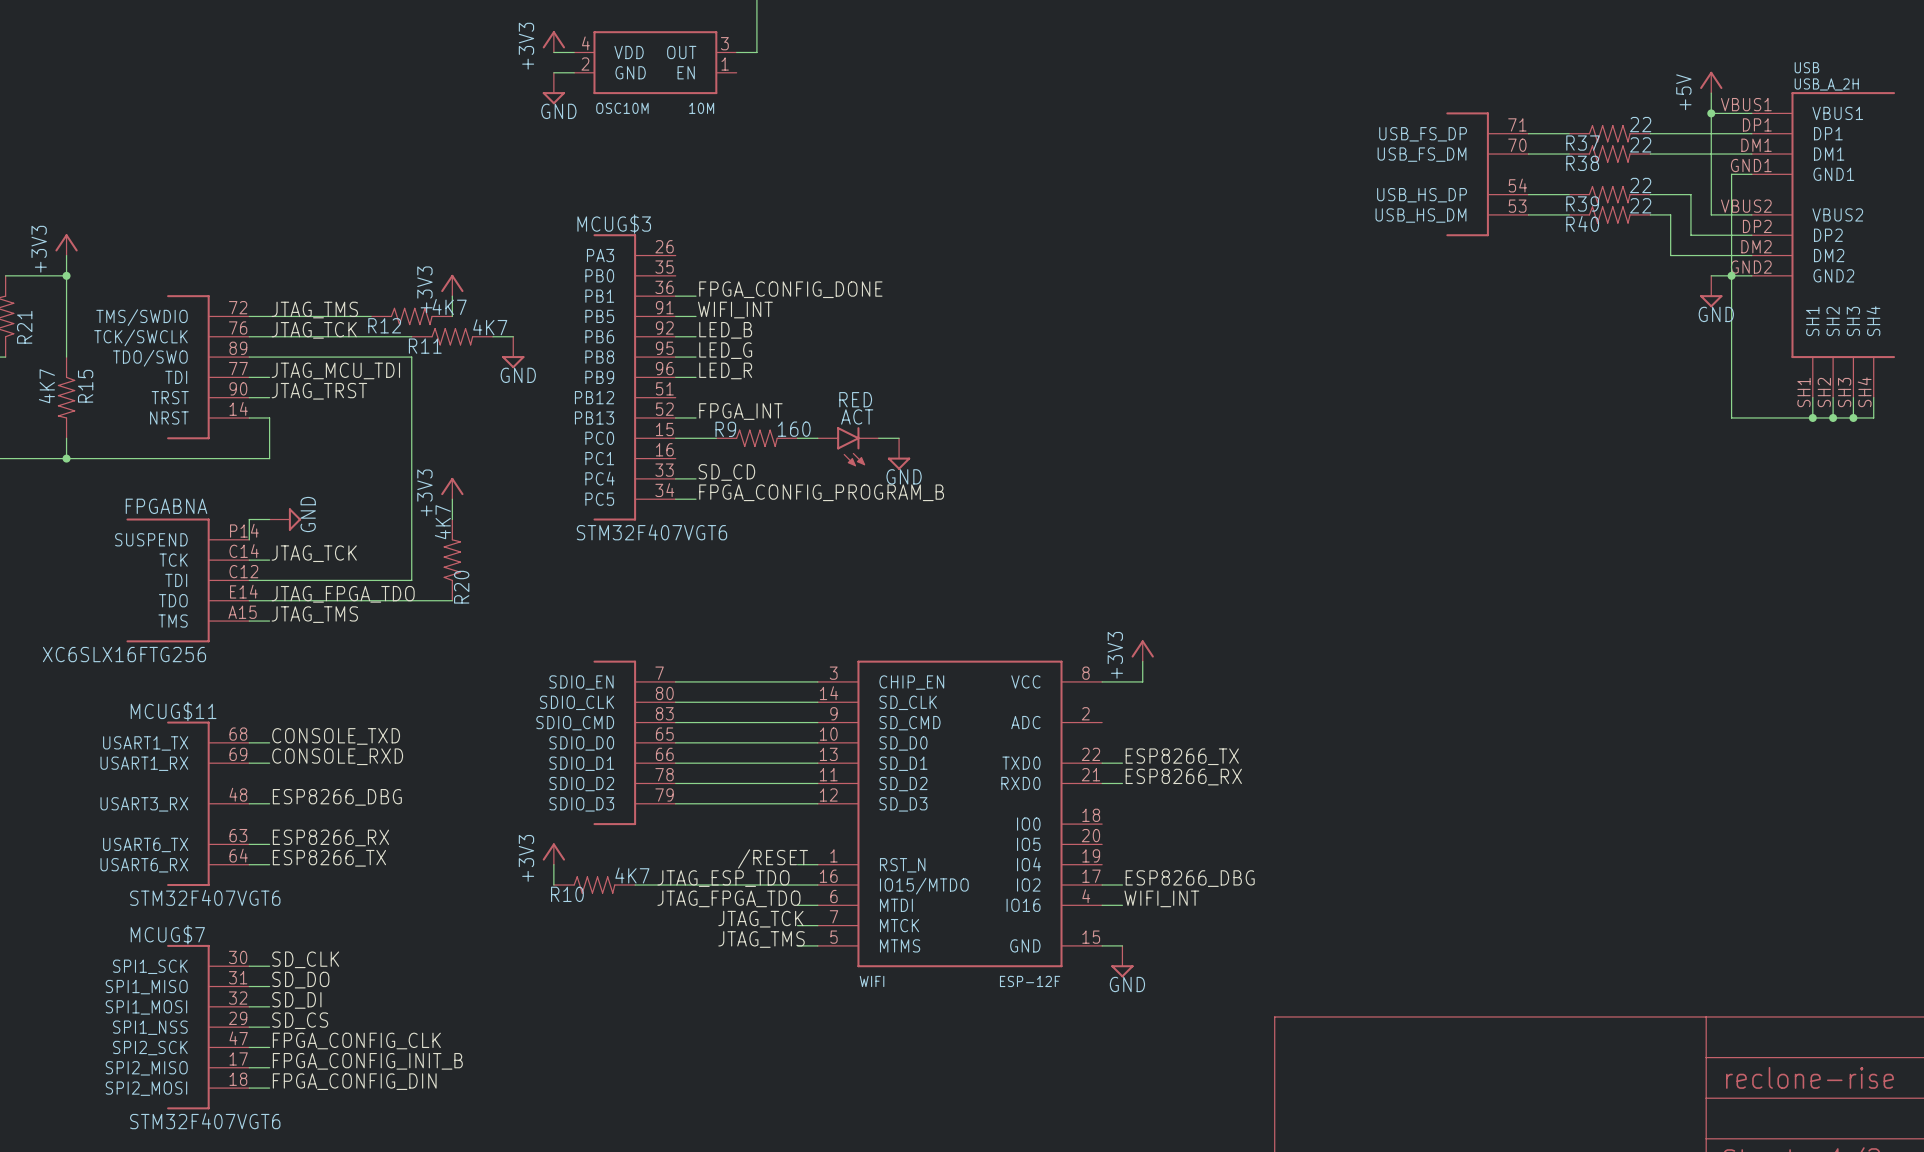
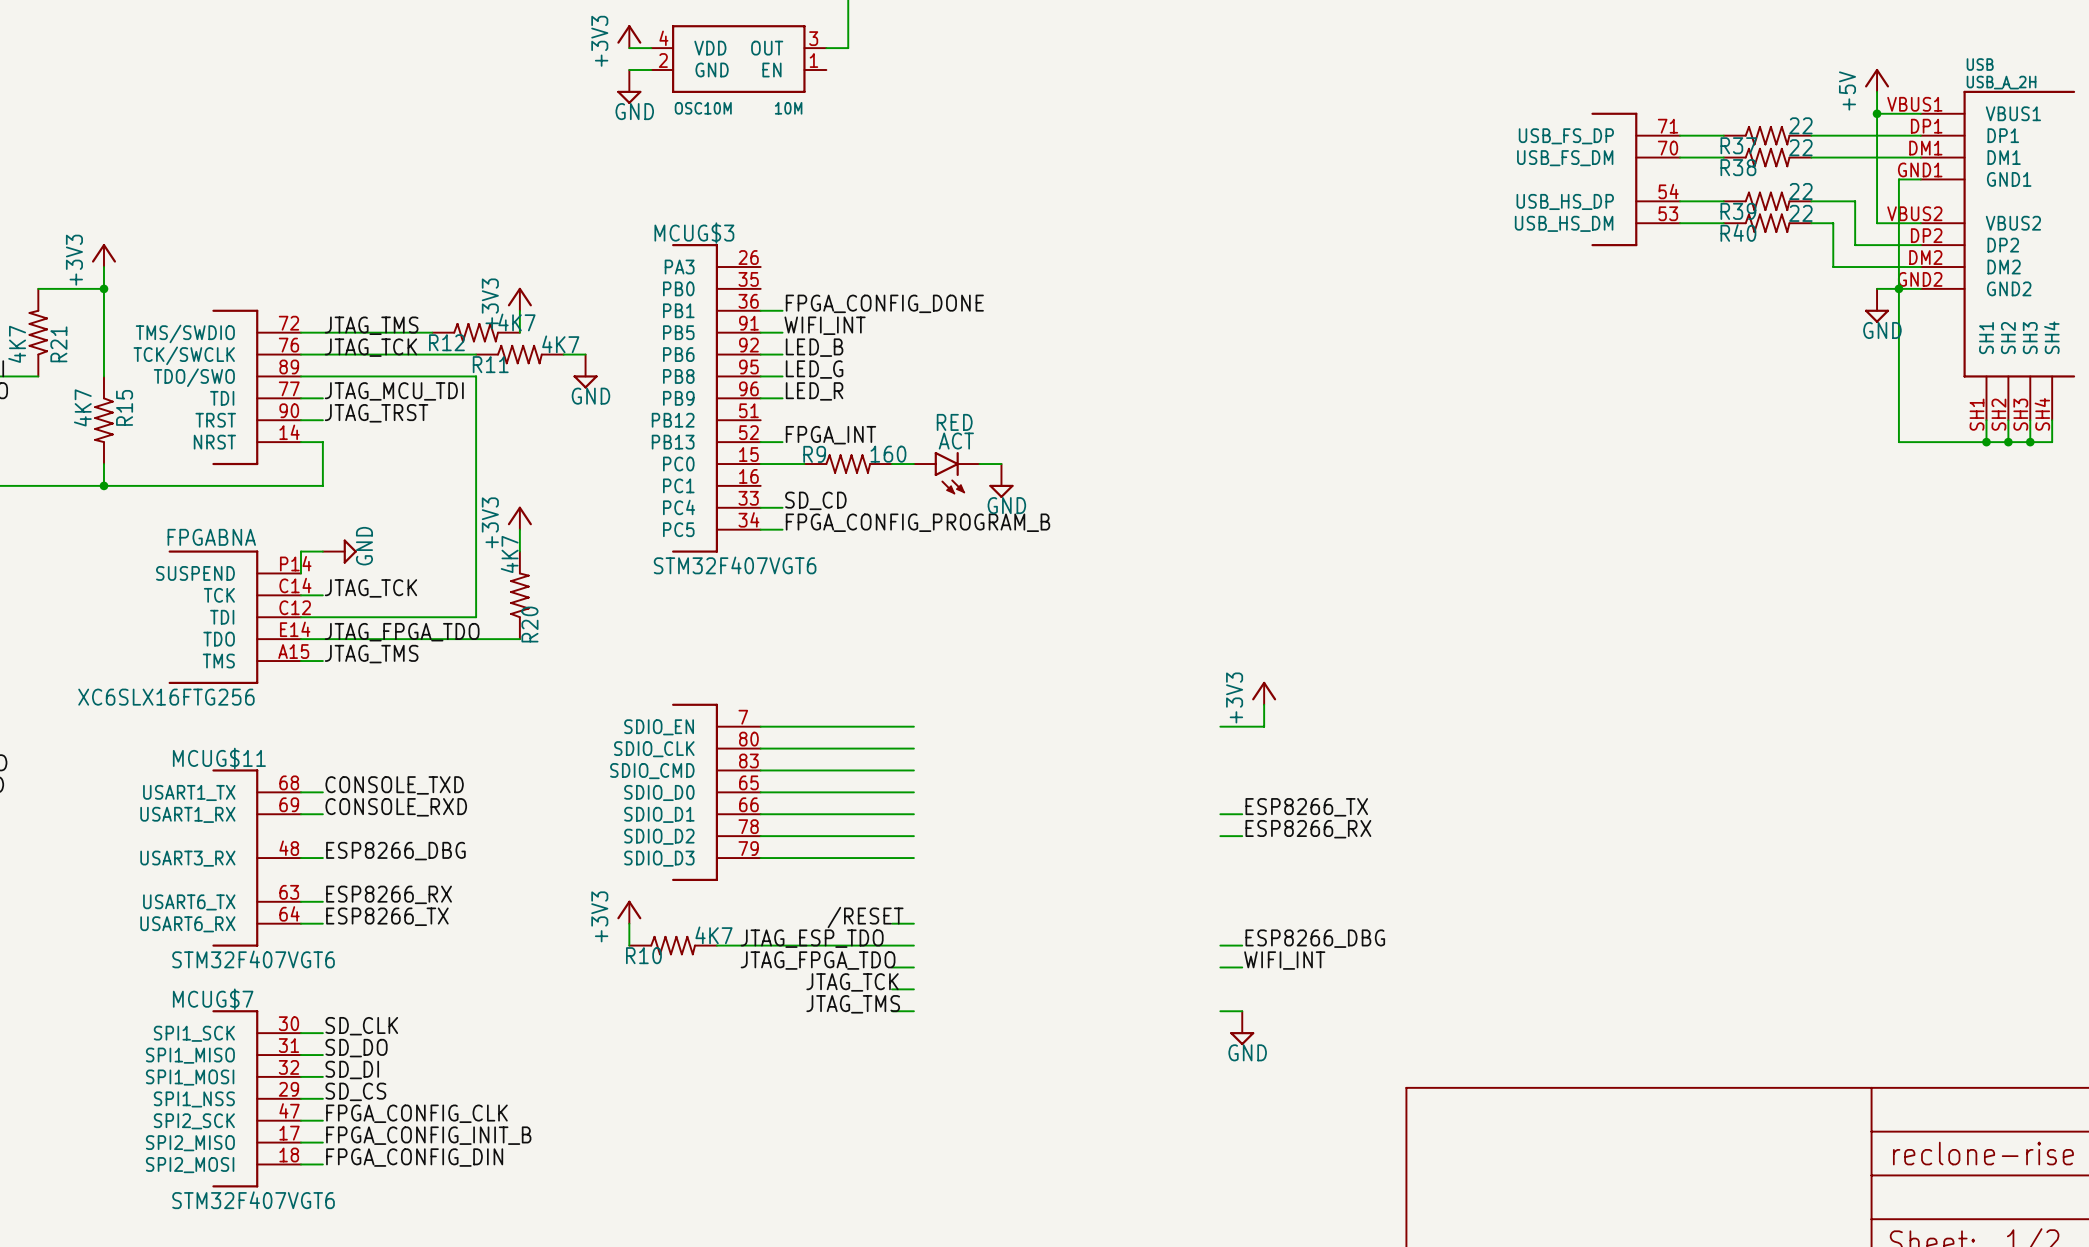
WIFI: ESP-12F (959, 813) -> none

